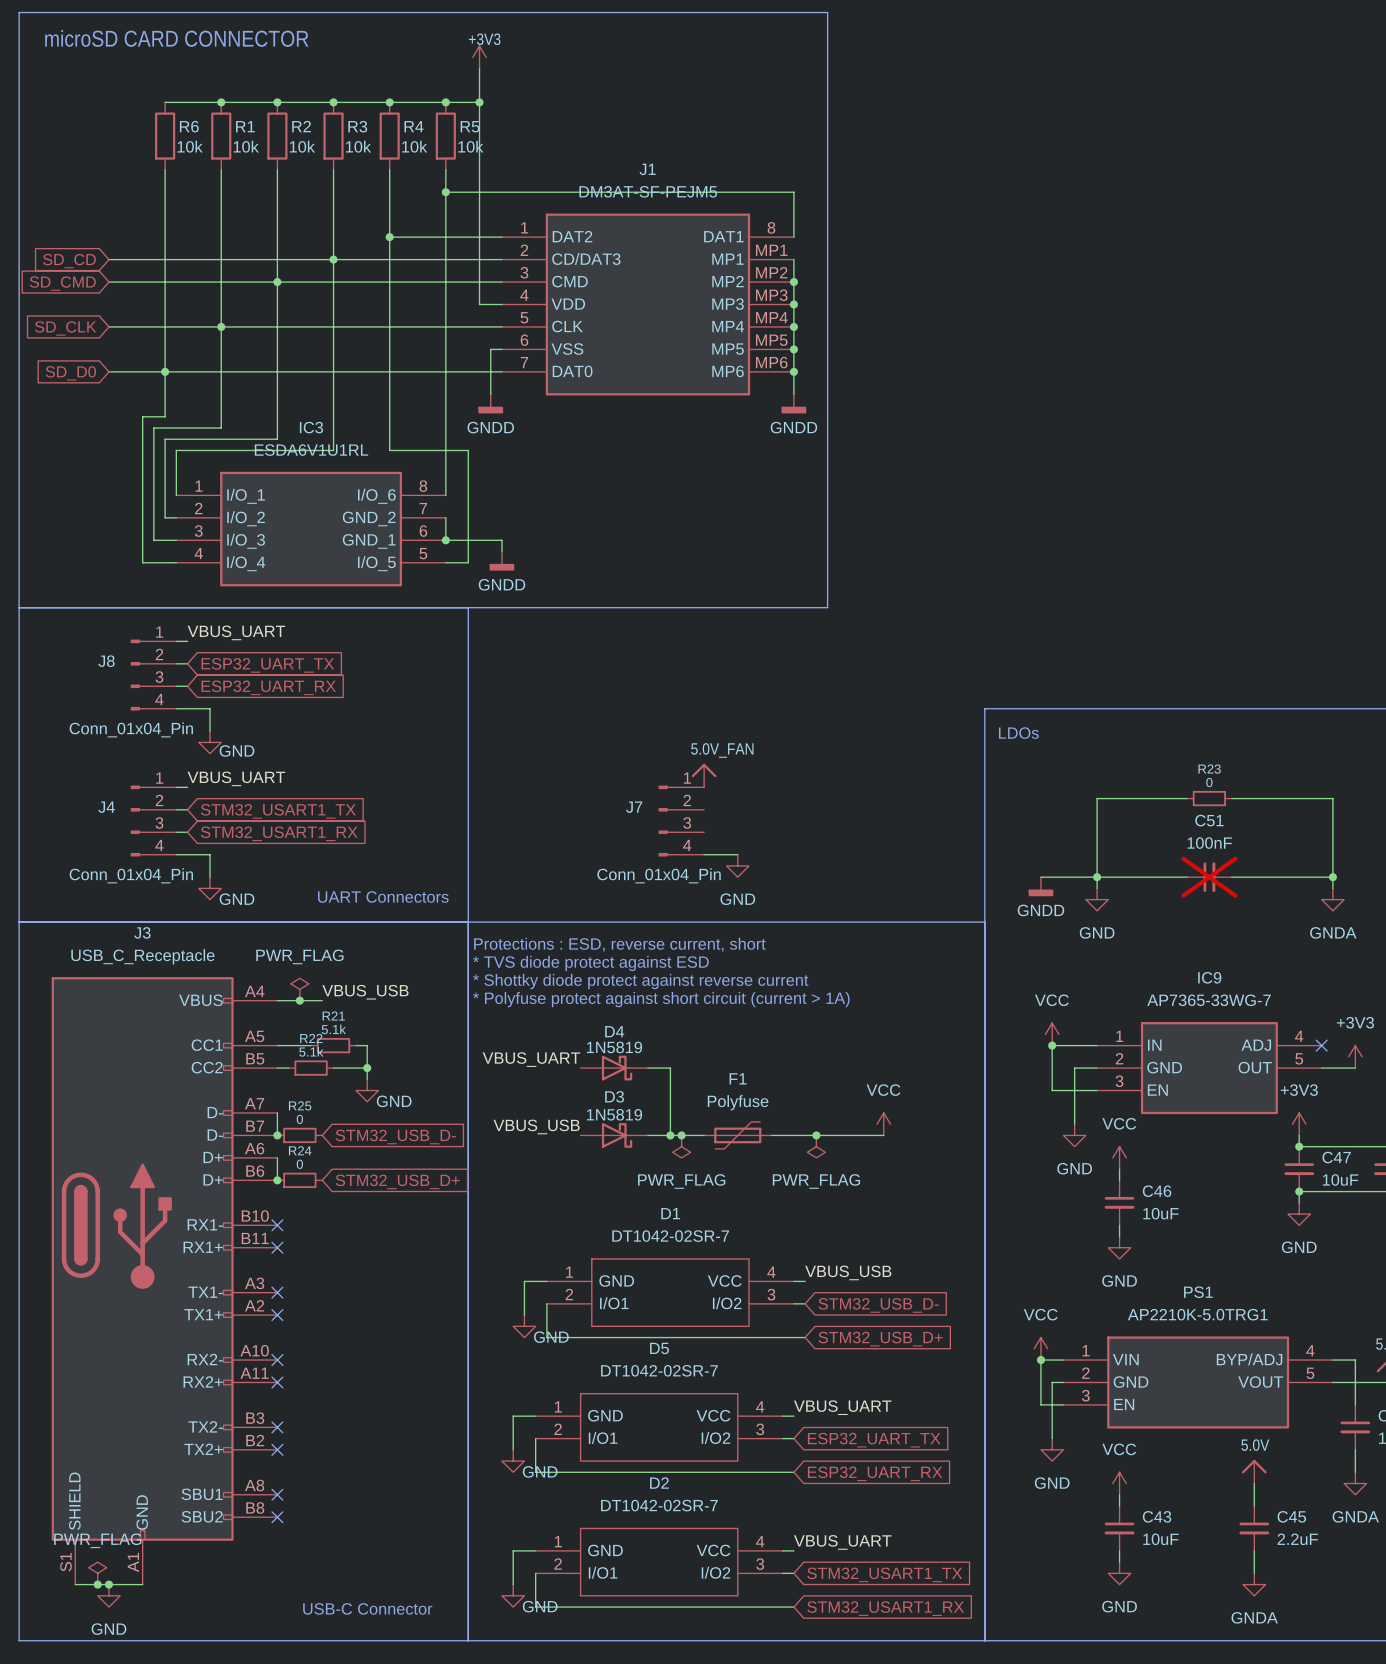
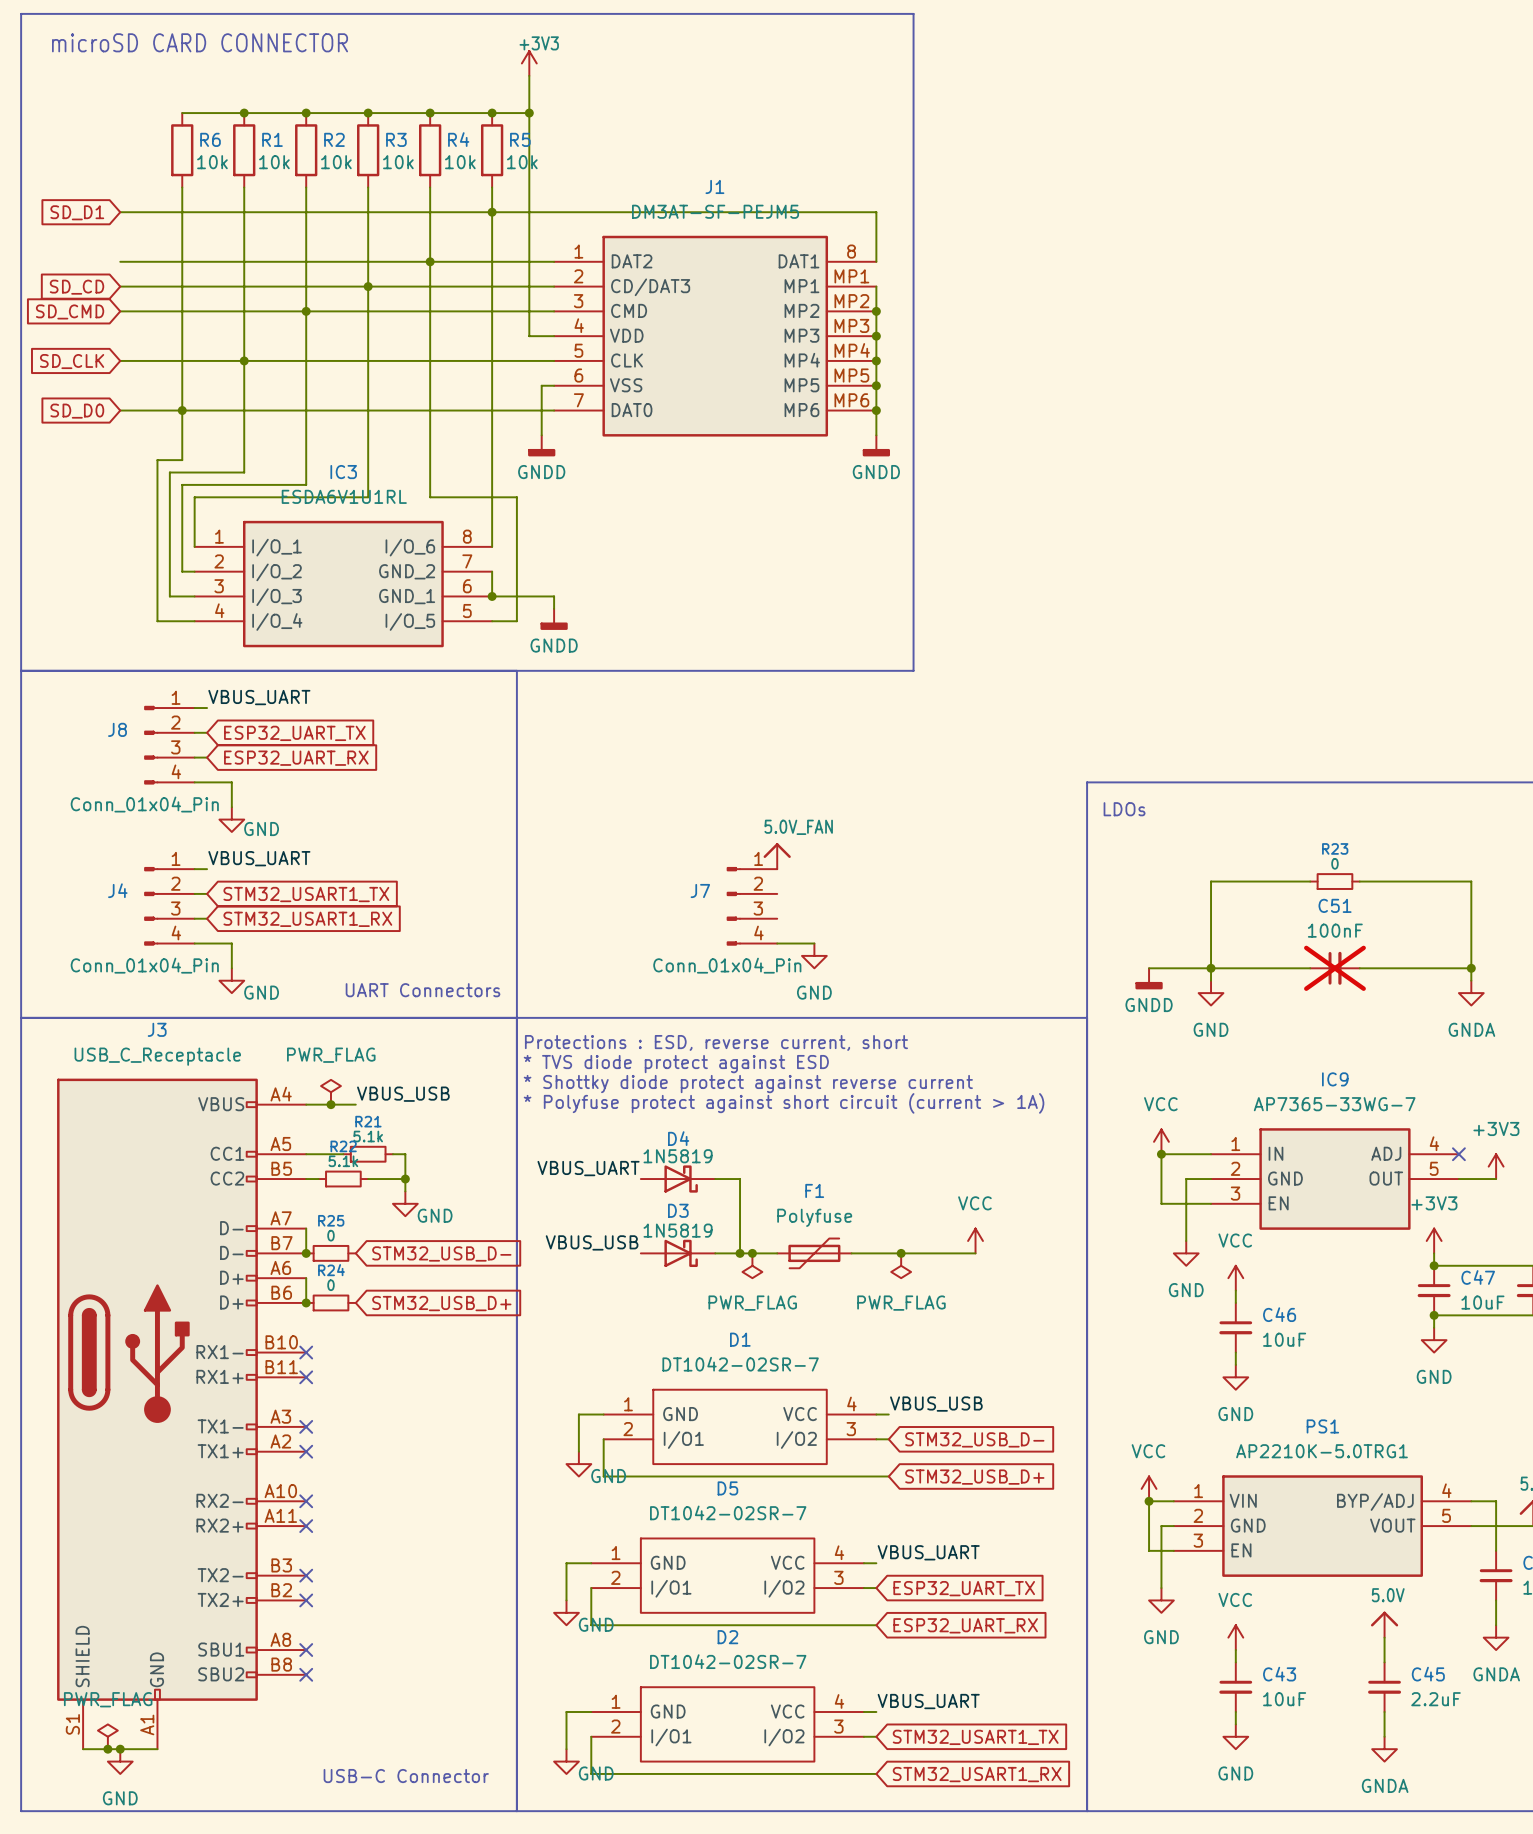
wire: none -> (120, 212) (492, 212)
global label: none -> SD_D1 (77, 212)
wire: none -> (120, 261) (430, 261)

